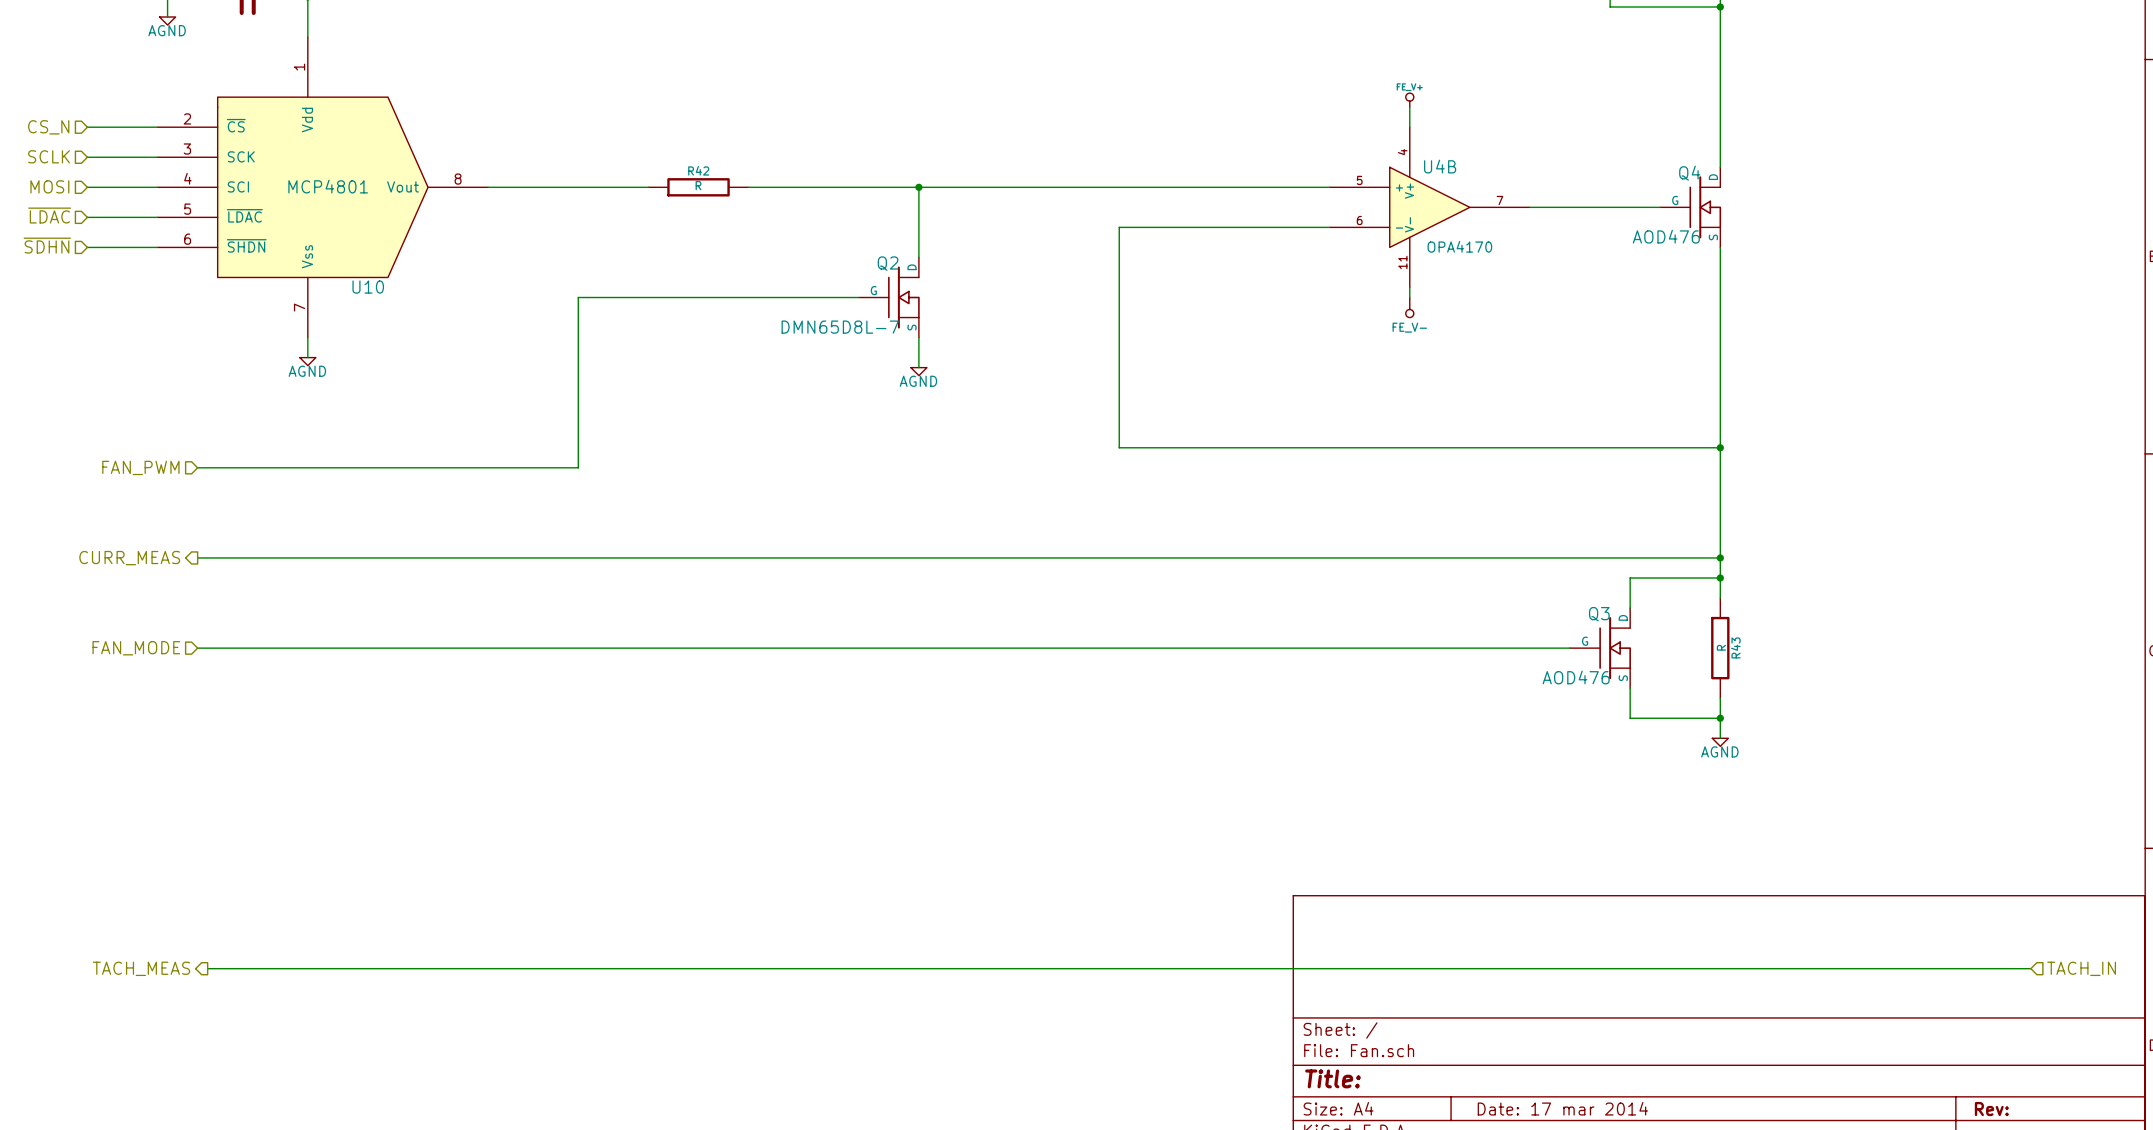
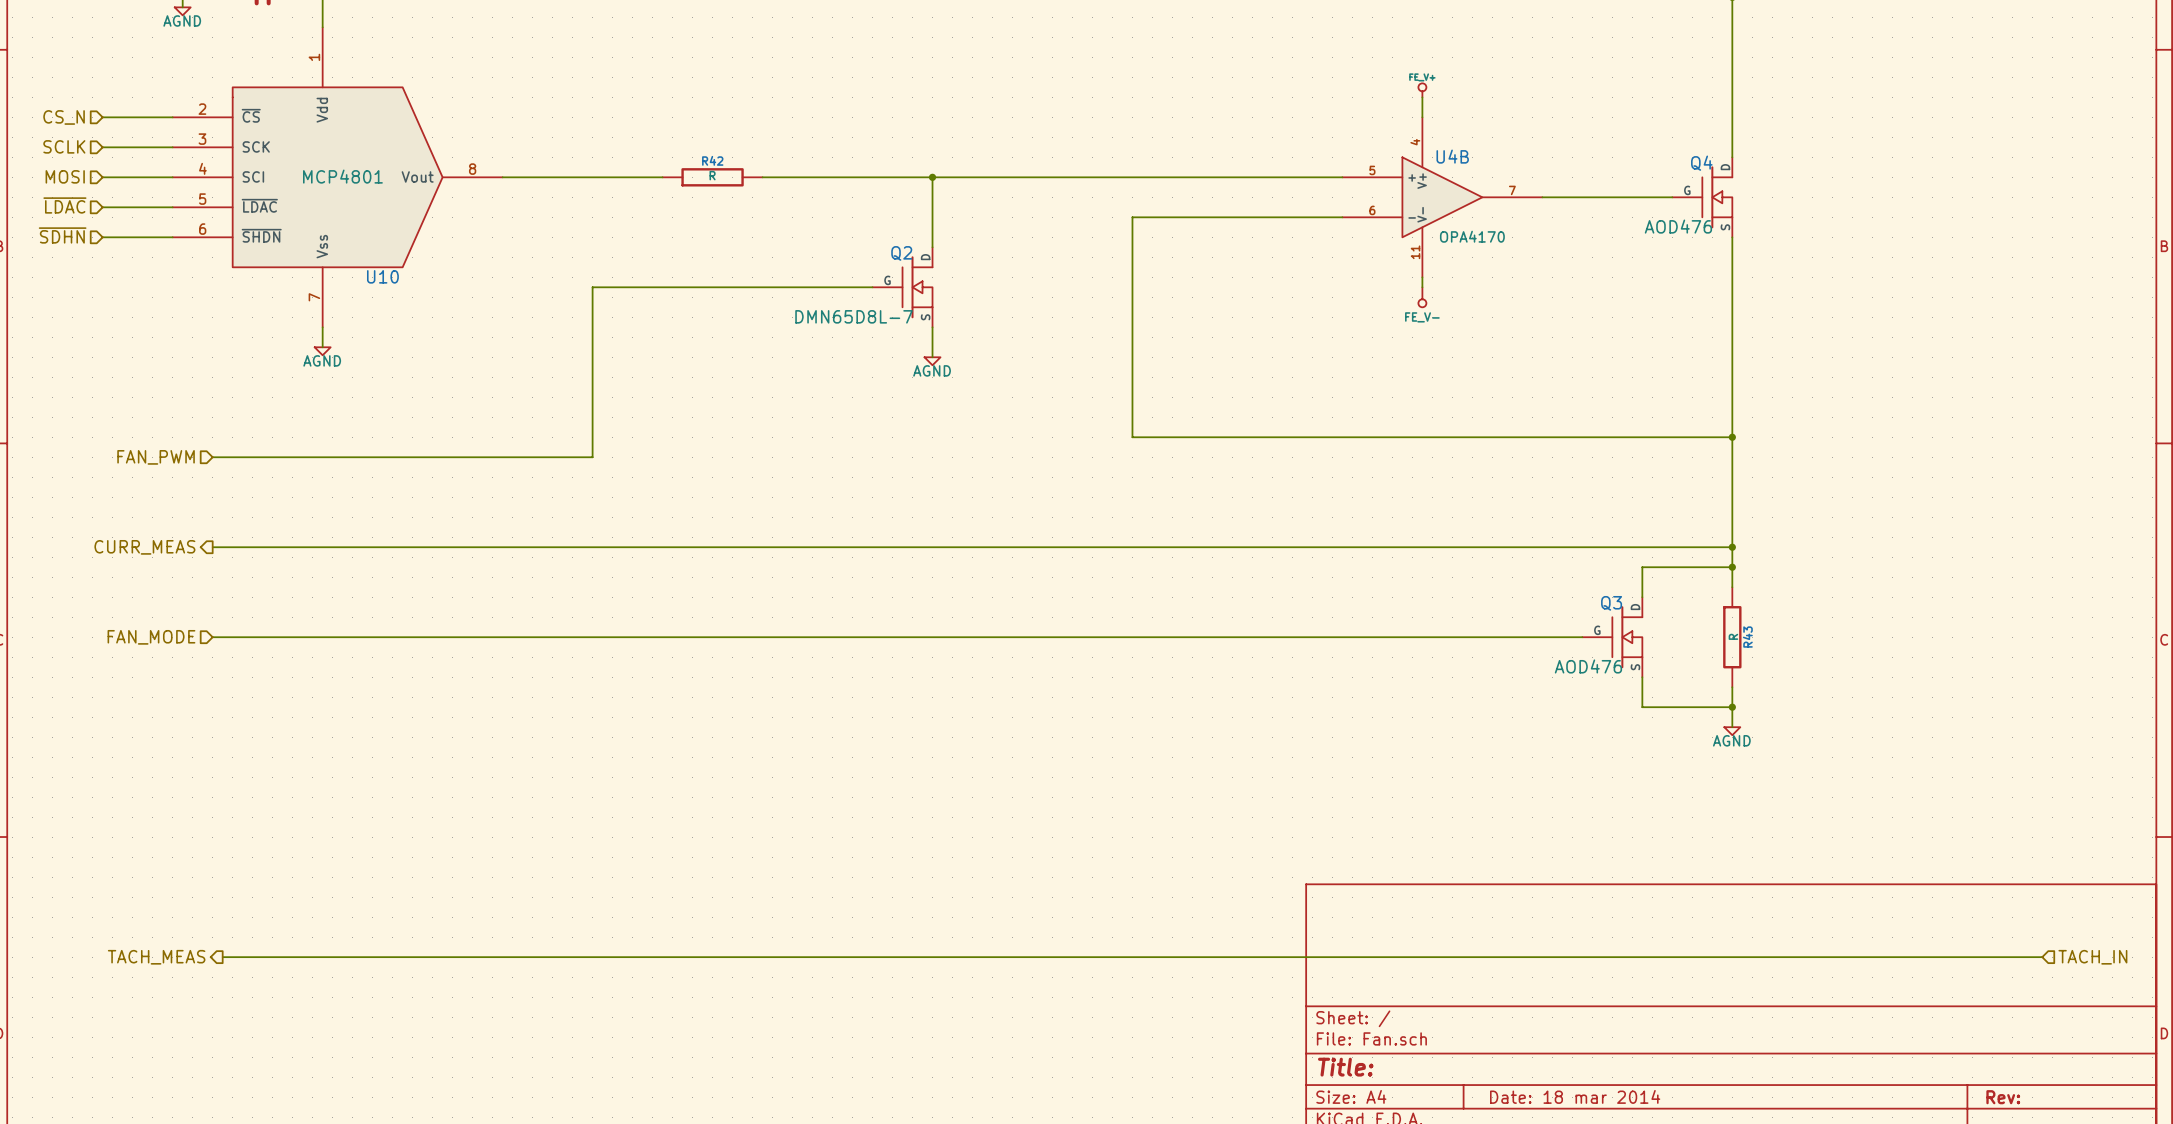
title block: Date: 17 mar 2014 (1562, 1108) -> Date: 18 mar 2014 (1575, 1096)

